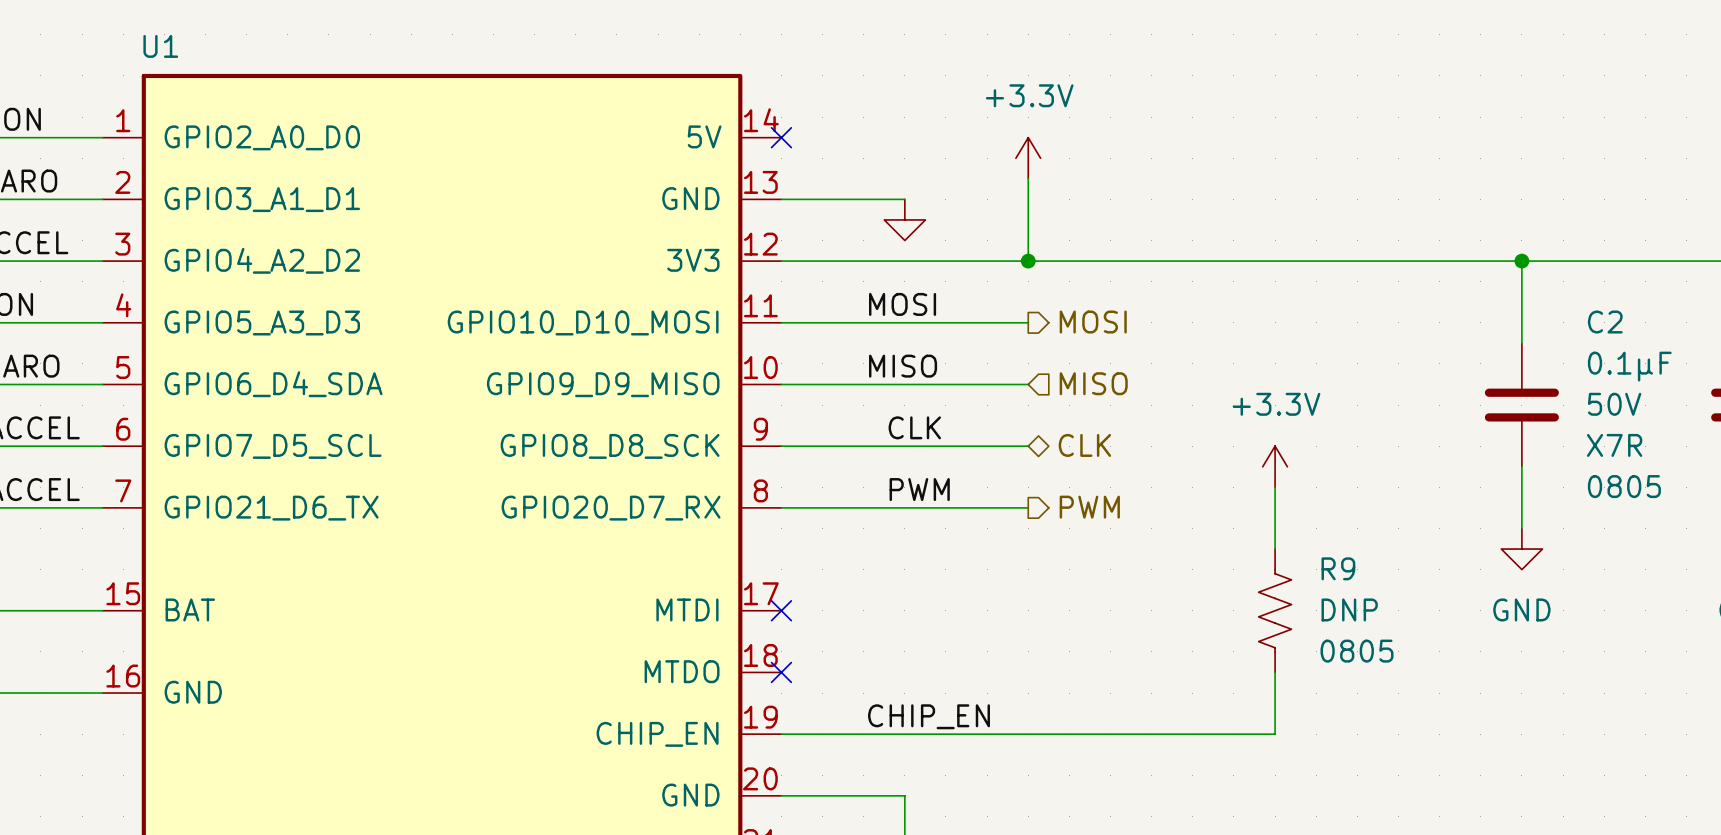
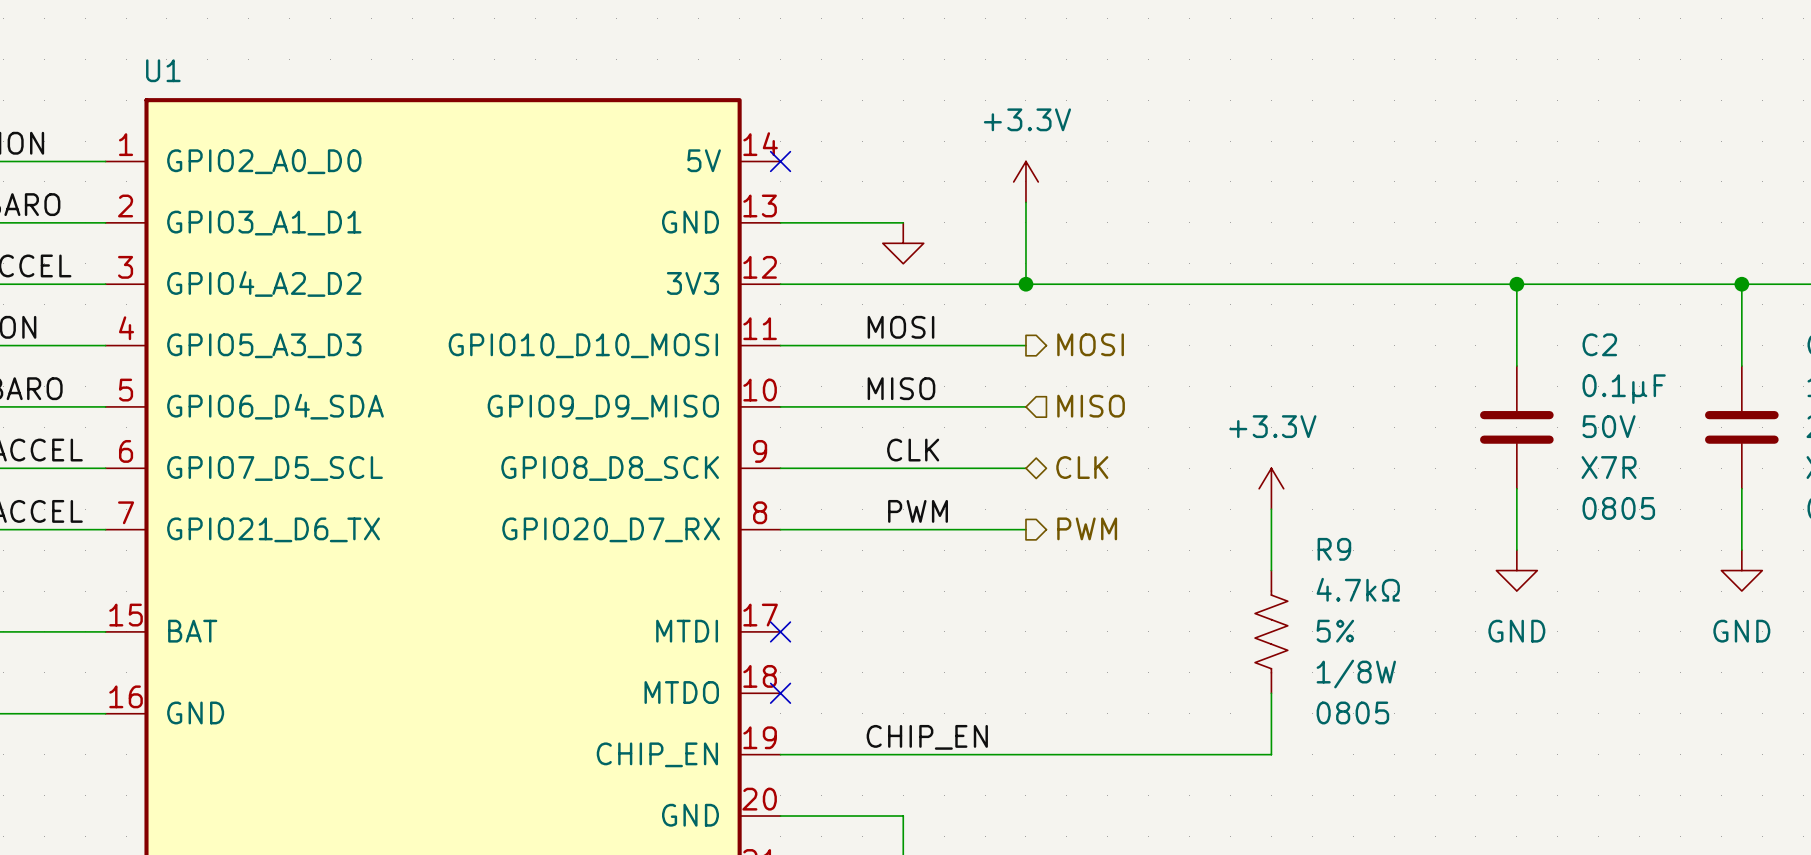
R9 name position: R9 (1338, 568) -> R9 (1334, 549)
R9 text: none -> 5% (1335, 631)
R9 text: DNP (1349, 609) -> 4.7kΩ (1358, 589)
R9 text position: 0805 (1357, 651) -> 0805 (1352, 712)
R9 text: none -> 1/8W (1356, 674)

